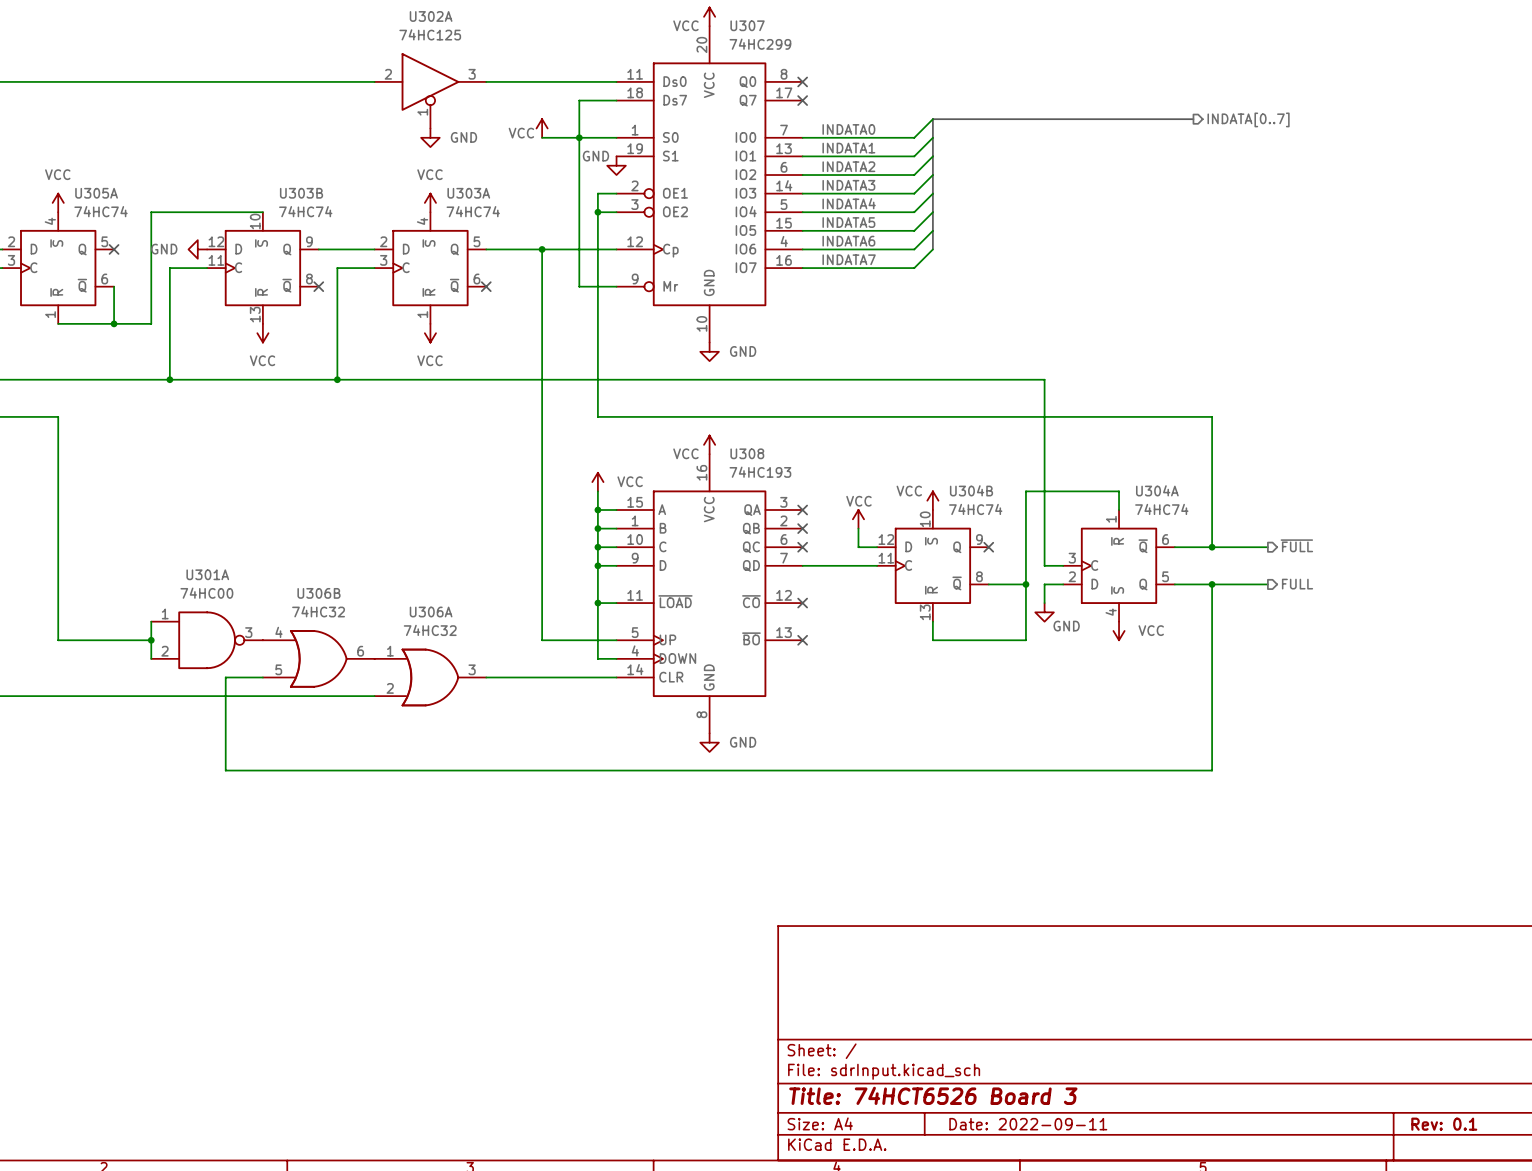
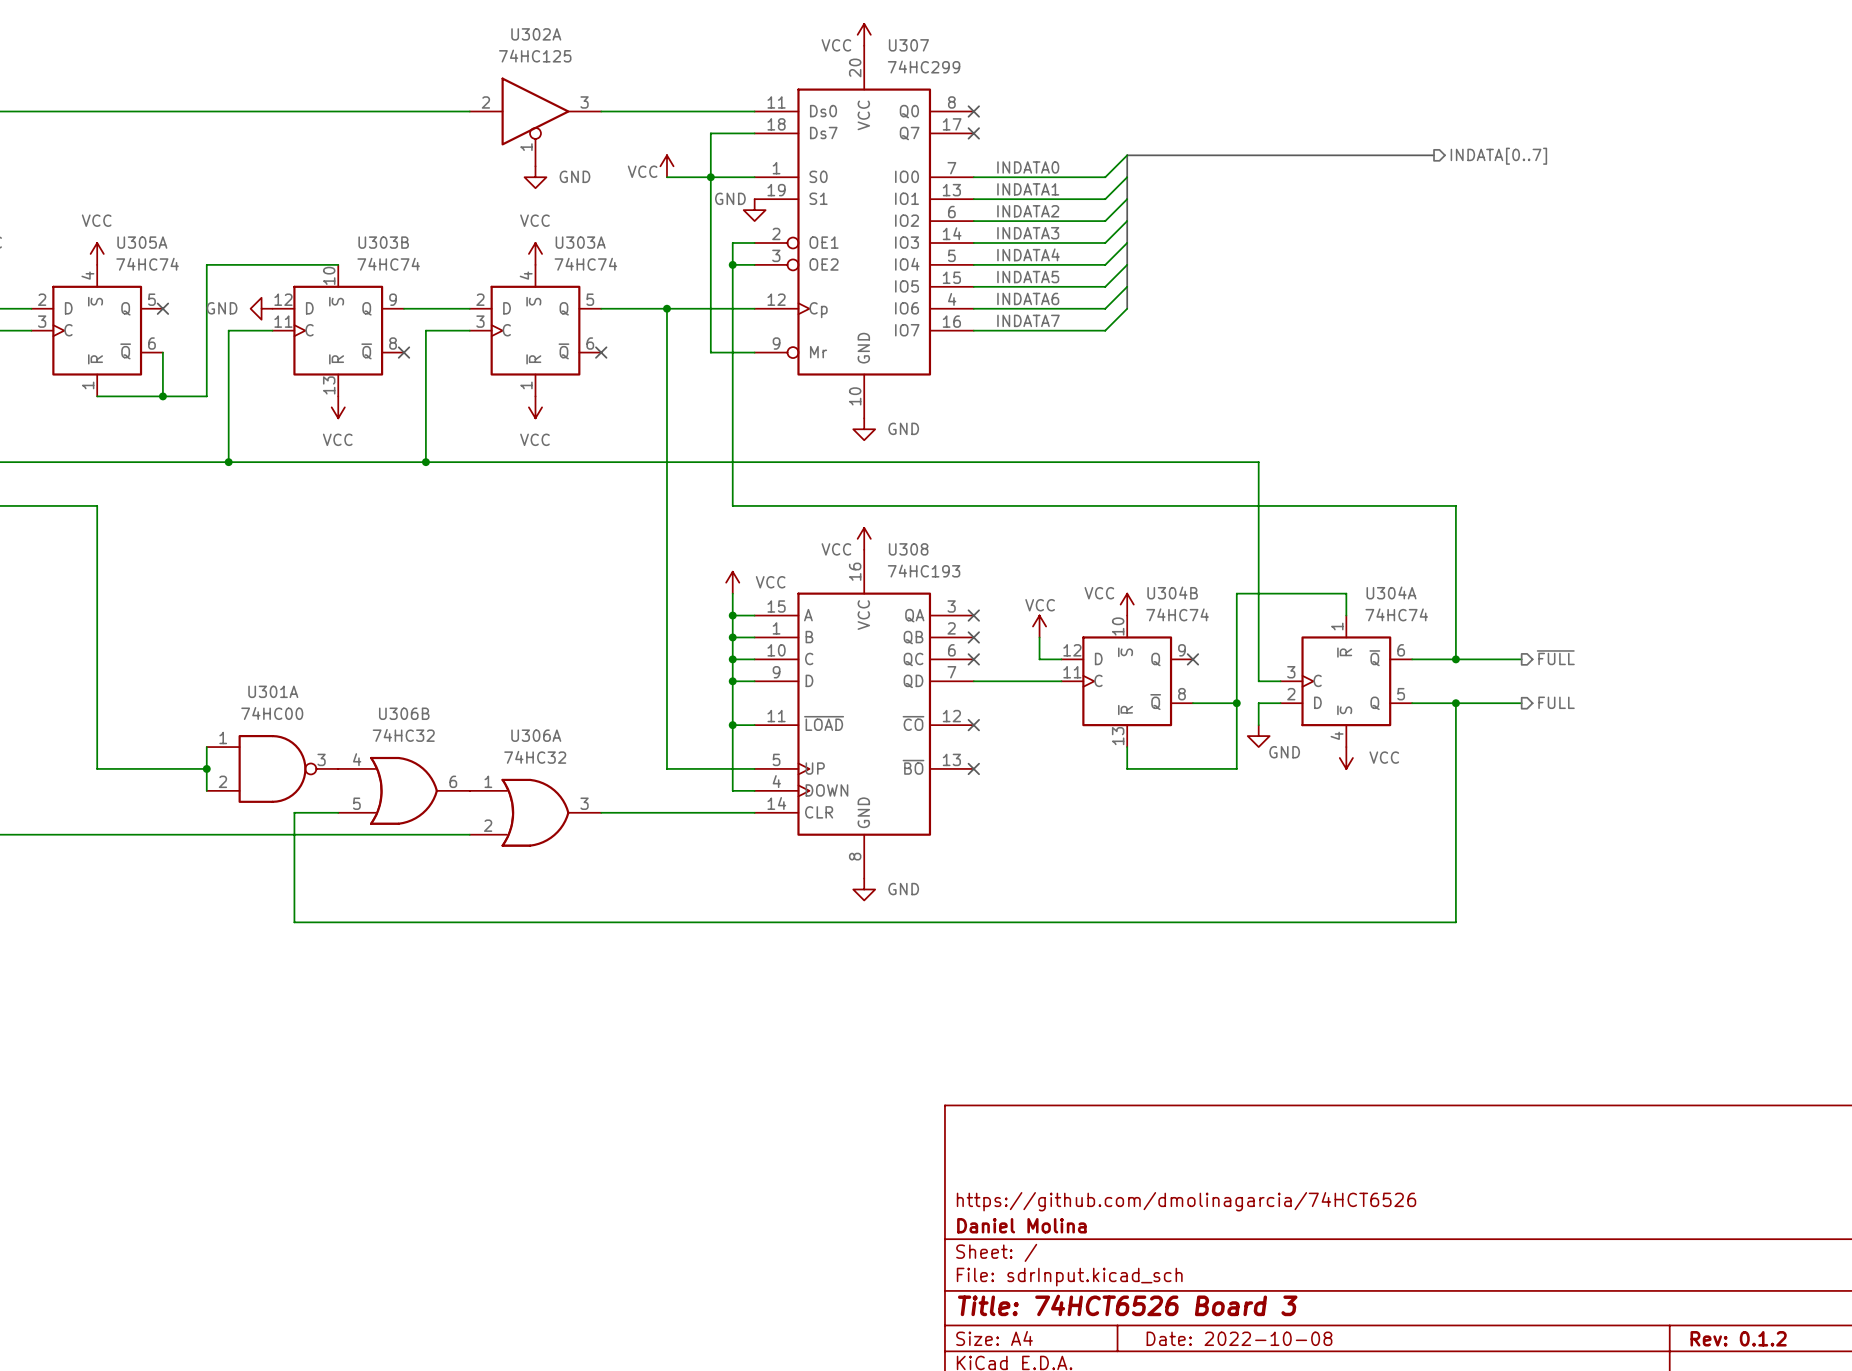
title block: none -> https://github.com/dmolinagarcia/74HCT6526 (1186, 1201)
title block: none -> Daniel Molina (1021, 1225)
title block: Date: 2022-09-11 (1028, 1124) -> Date: 2022-10-08 (1239, 1338)
title block: Rev: 0.1 (1444, 1124) -> Rev: 0.1.2 (1738, 1338)

